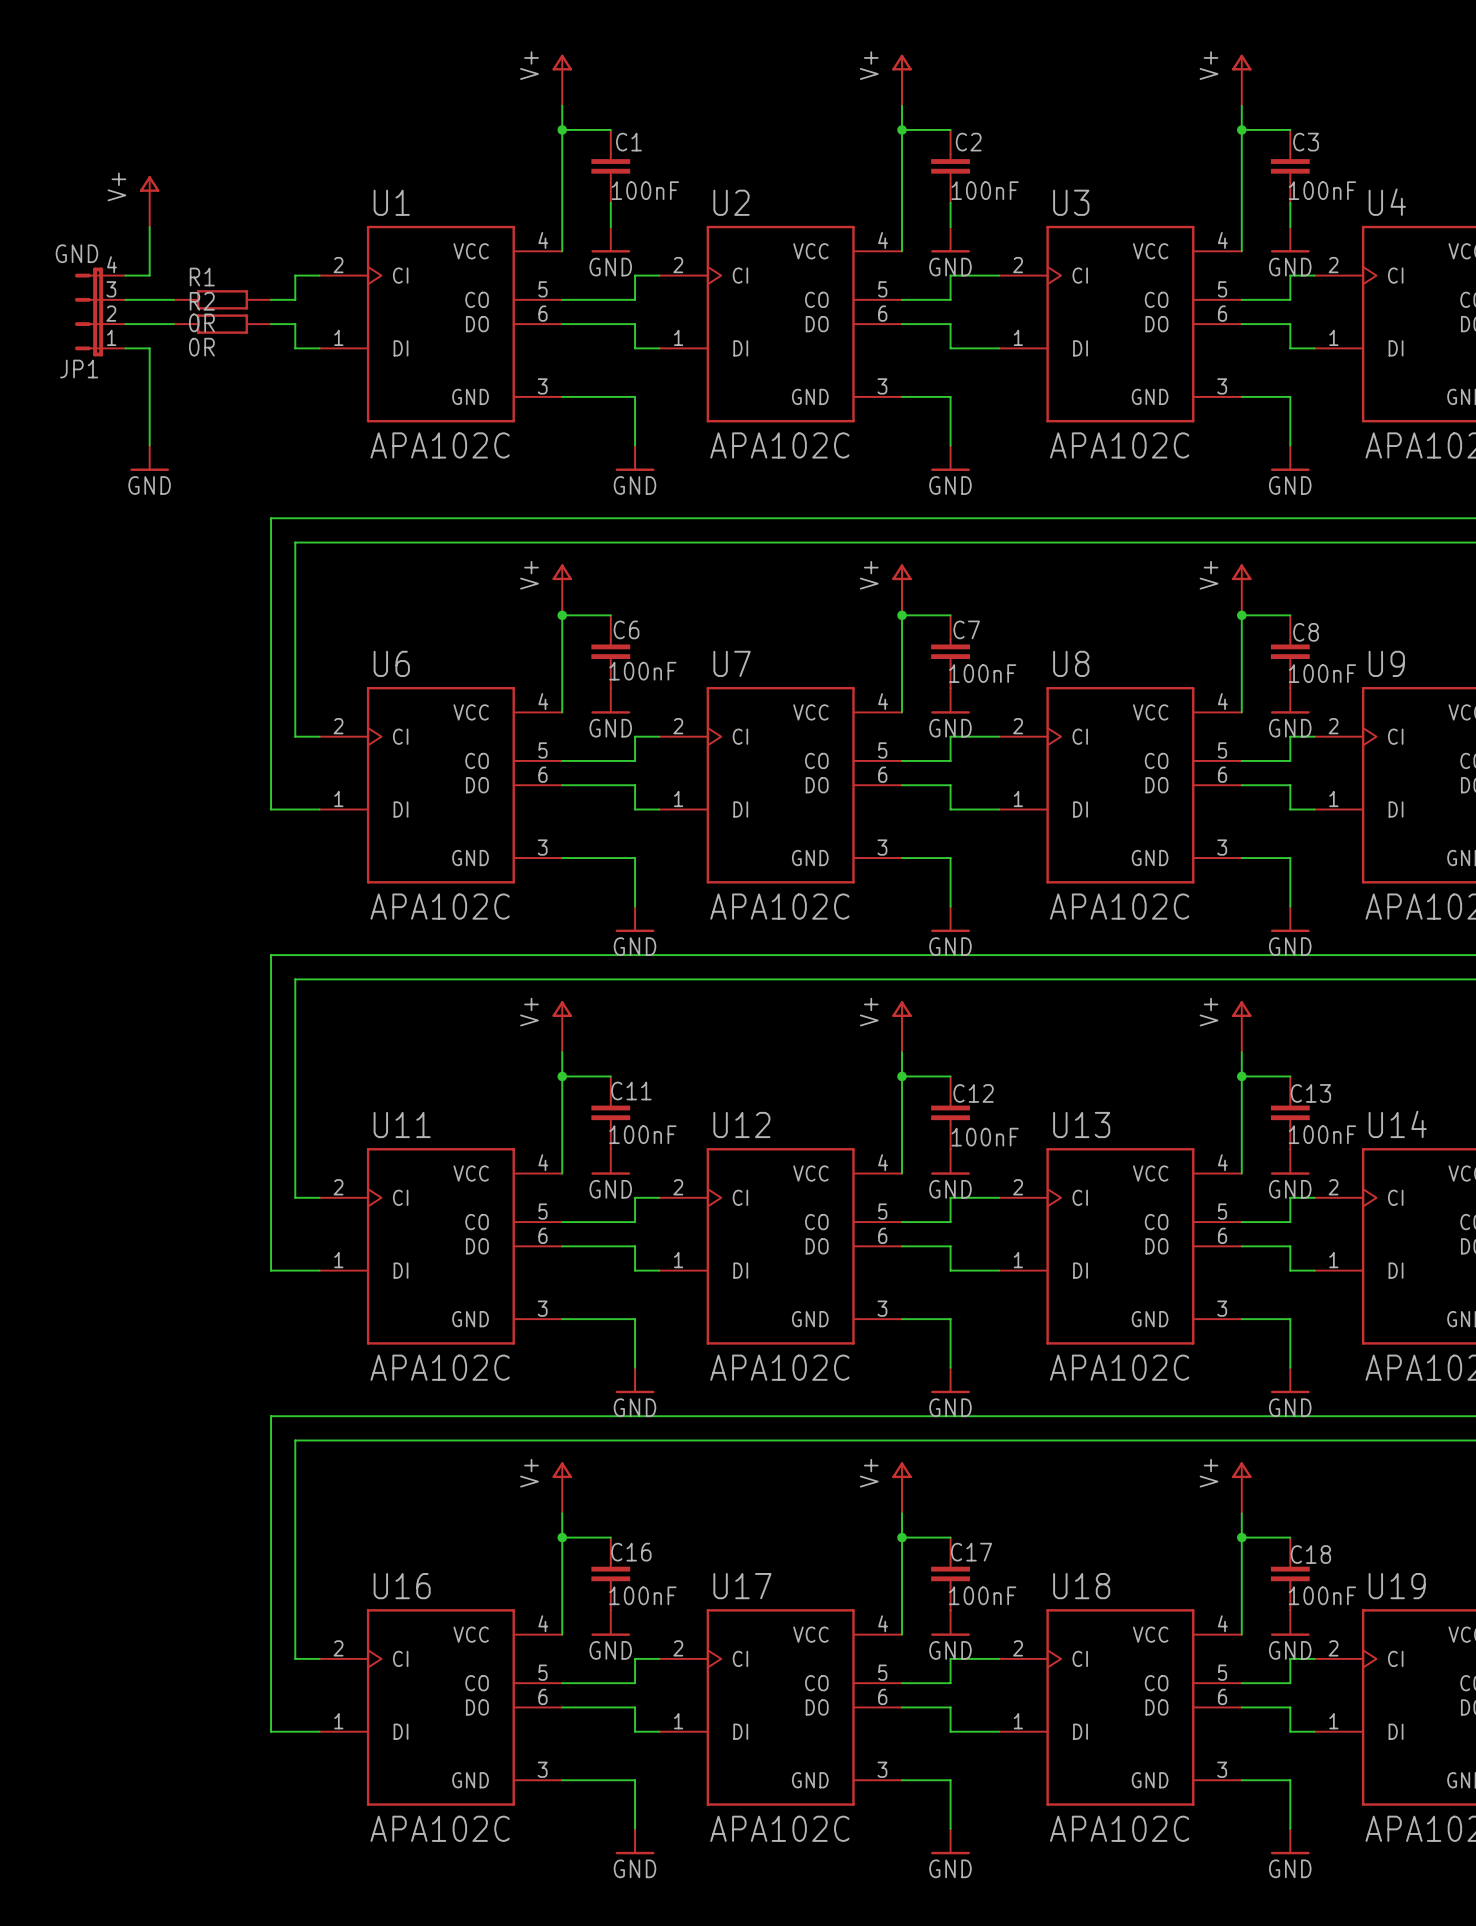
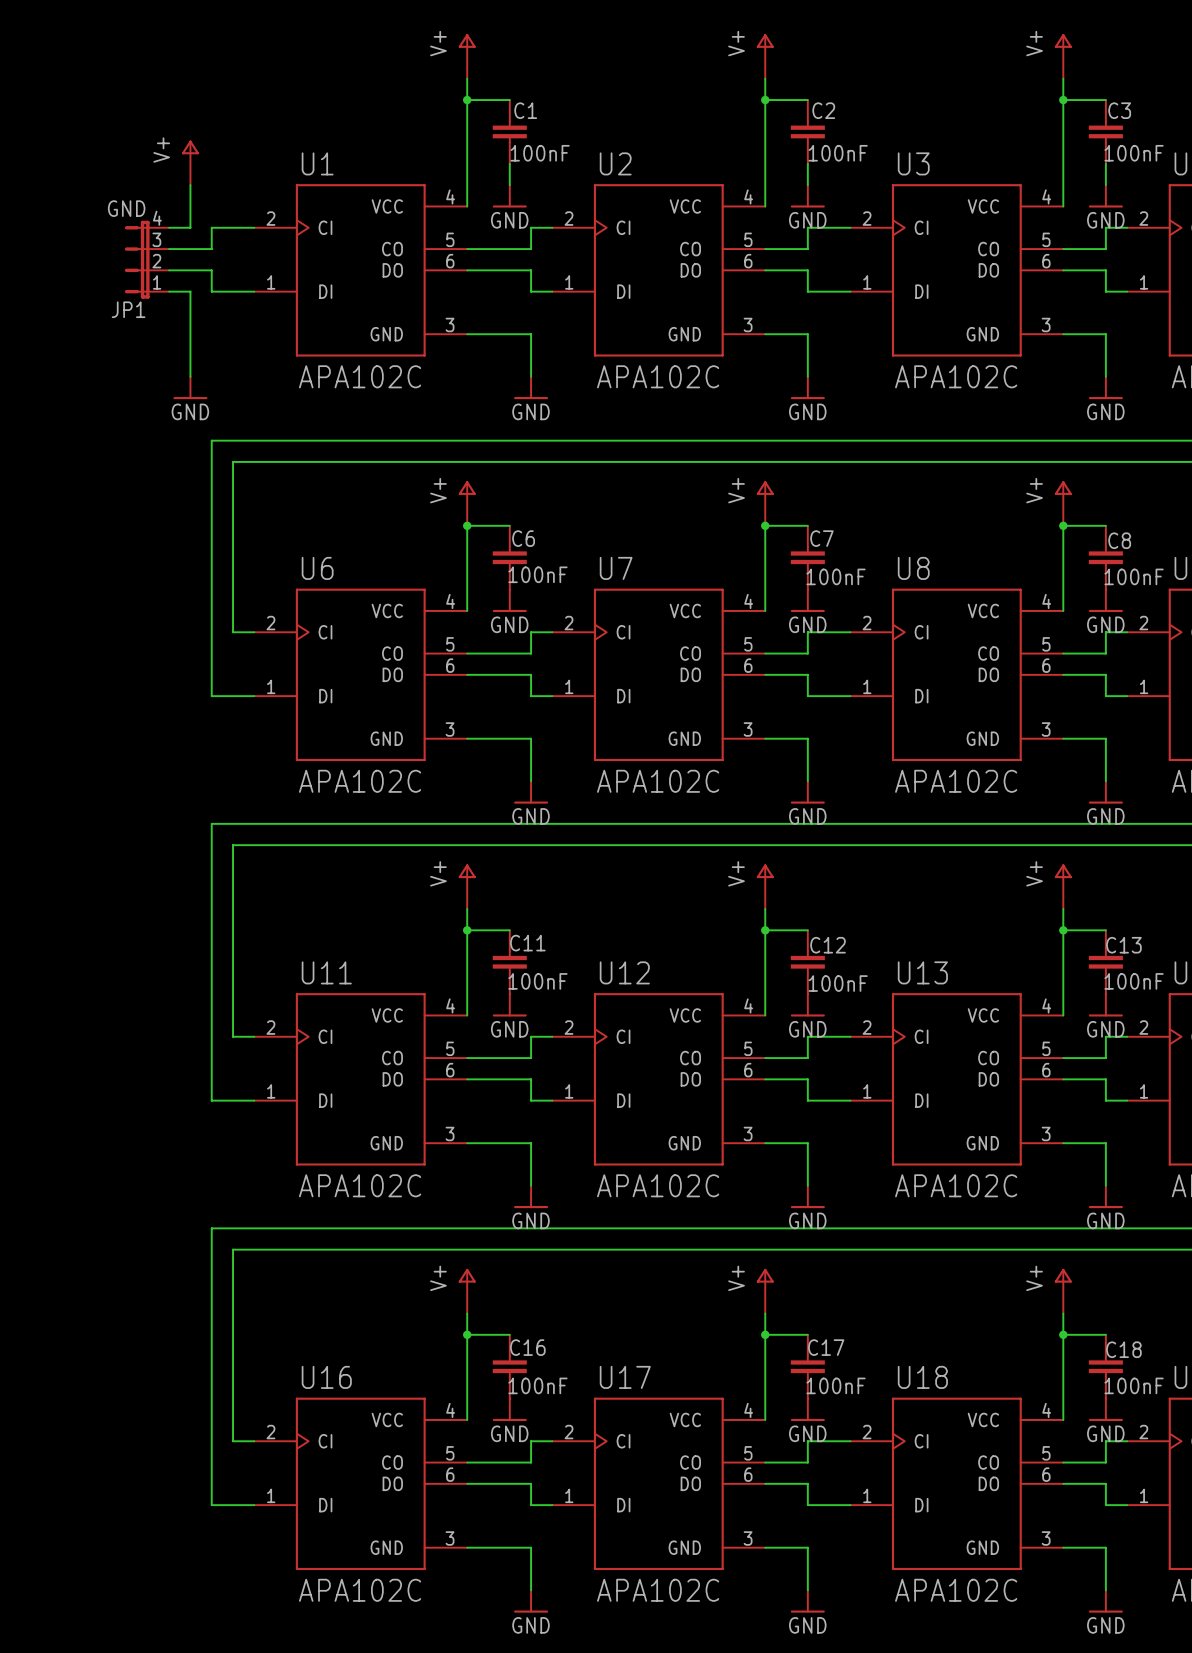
power symbol position: V+ (149, 201) -> V+ (190, 162)
wire: (149, 227) (149, 275) (125, 275) -> (190, 185) (190, 227) (169, 227)
wire: (295, 275) (295, 299) (271, 299) -> (233, 227) (211, 227) (211, 249) (169, 249)
wire: (125, 299) (173, 299) -> none
R1: 0R (222, 299) -> none
JP1 position: (100, 311) -> (147, 259)
wire: (125, 324) (173, 324) -> none
R2: 0R (222, 324) -> none
wire: (271, 324) (295, 324) (295, 348) -> (169, 270) (211, 270) (211, 291) (233, 291)
wire: (125, 348) (149, 348) (149, 445) -> (169, 291) (190, 291) (190, 376)
power symbol position: GND (149, 458) -> GND (190, 387)

